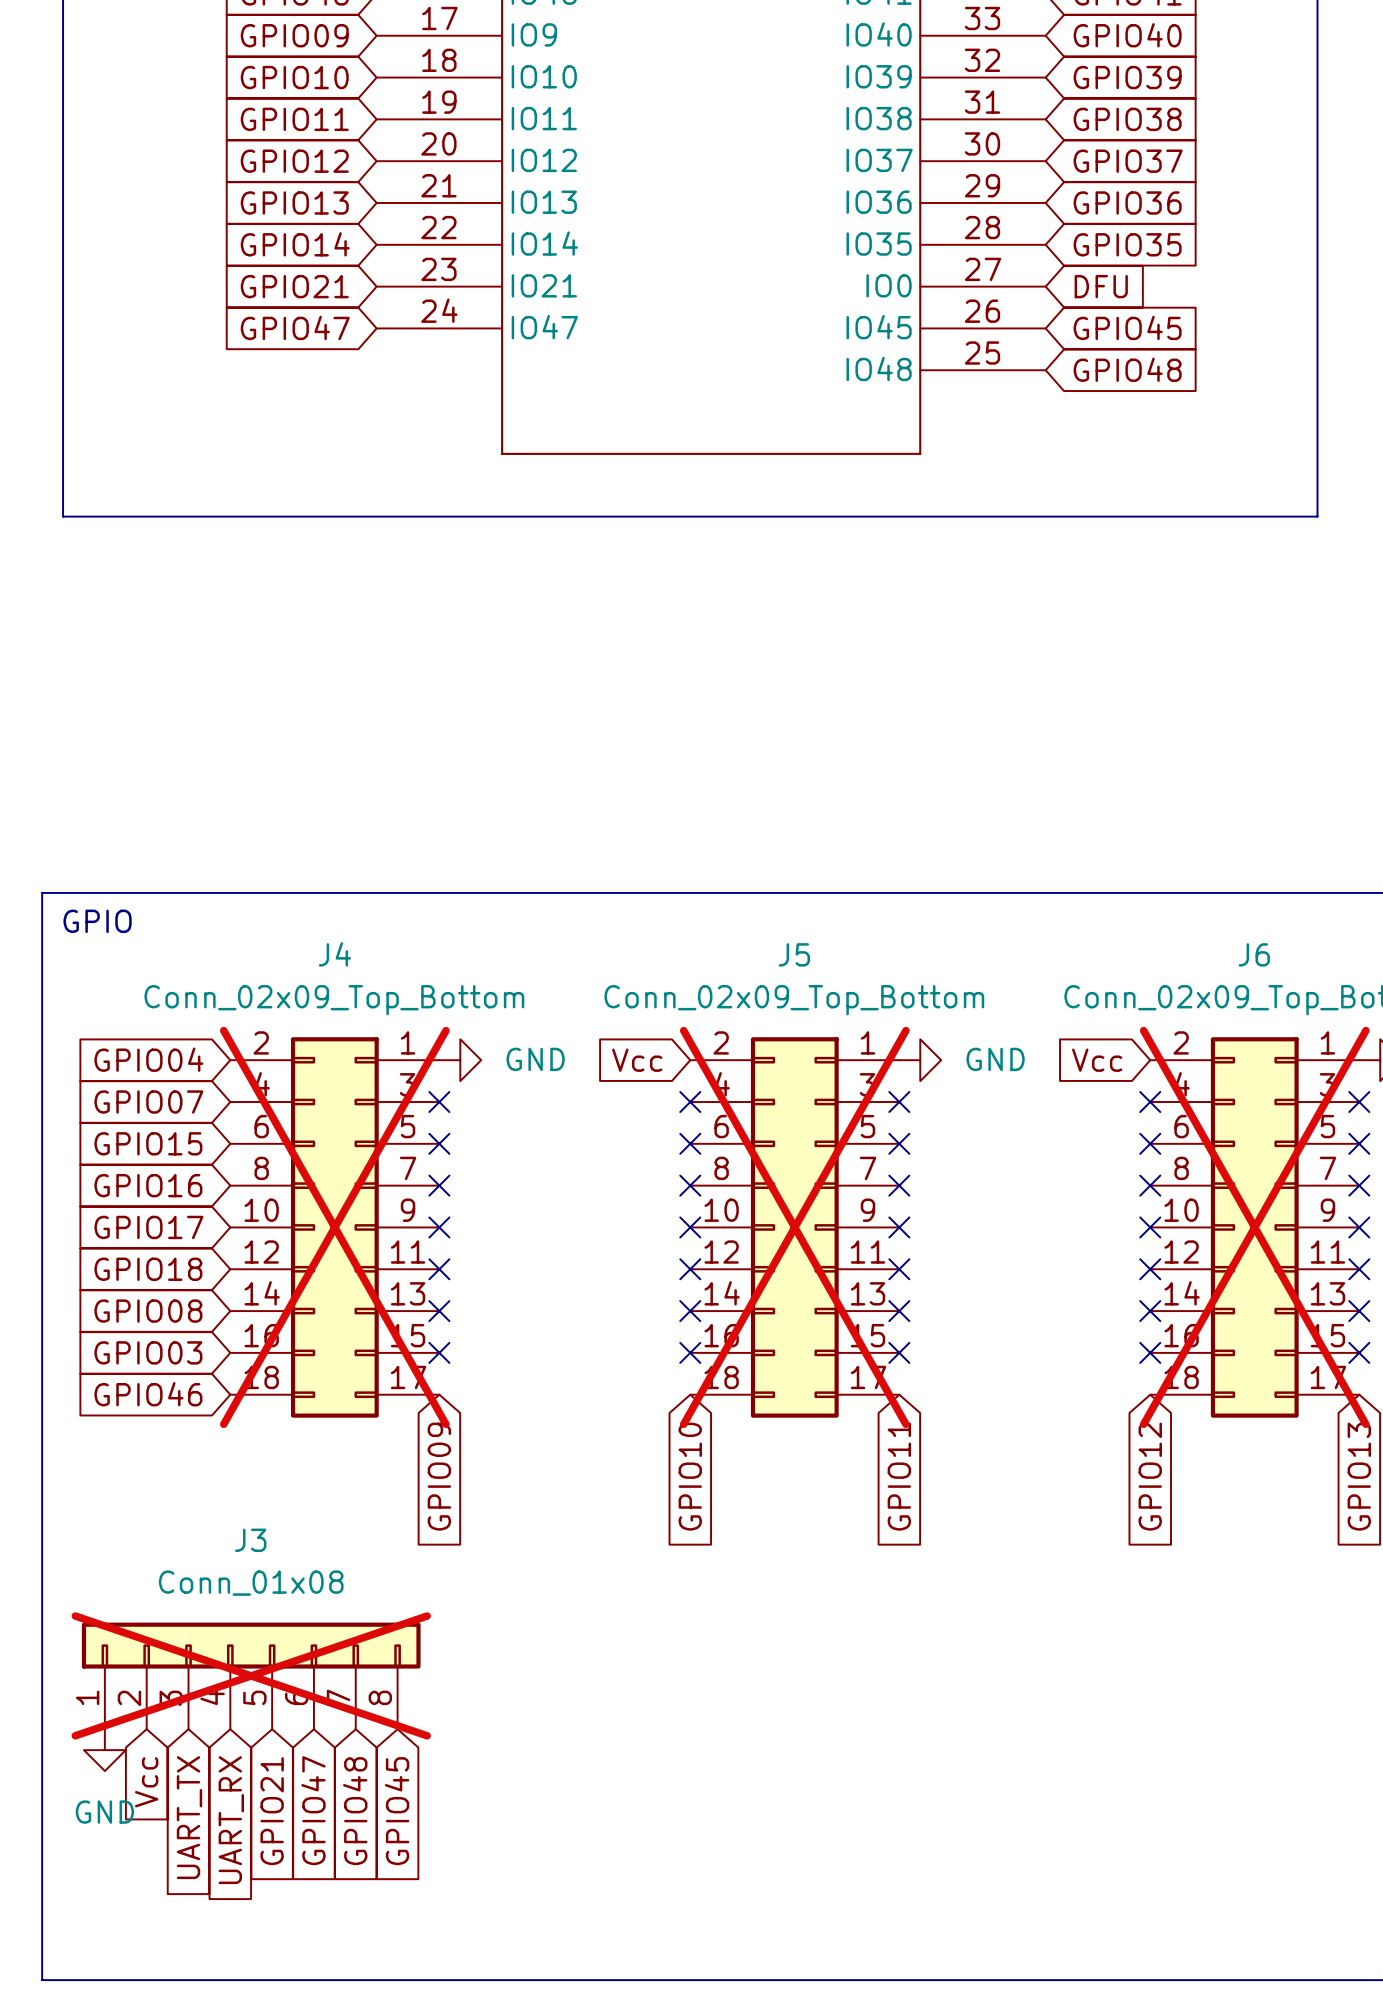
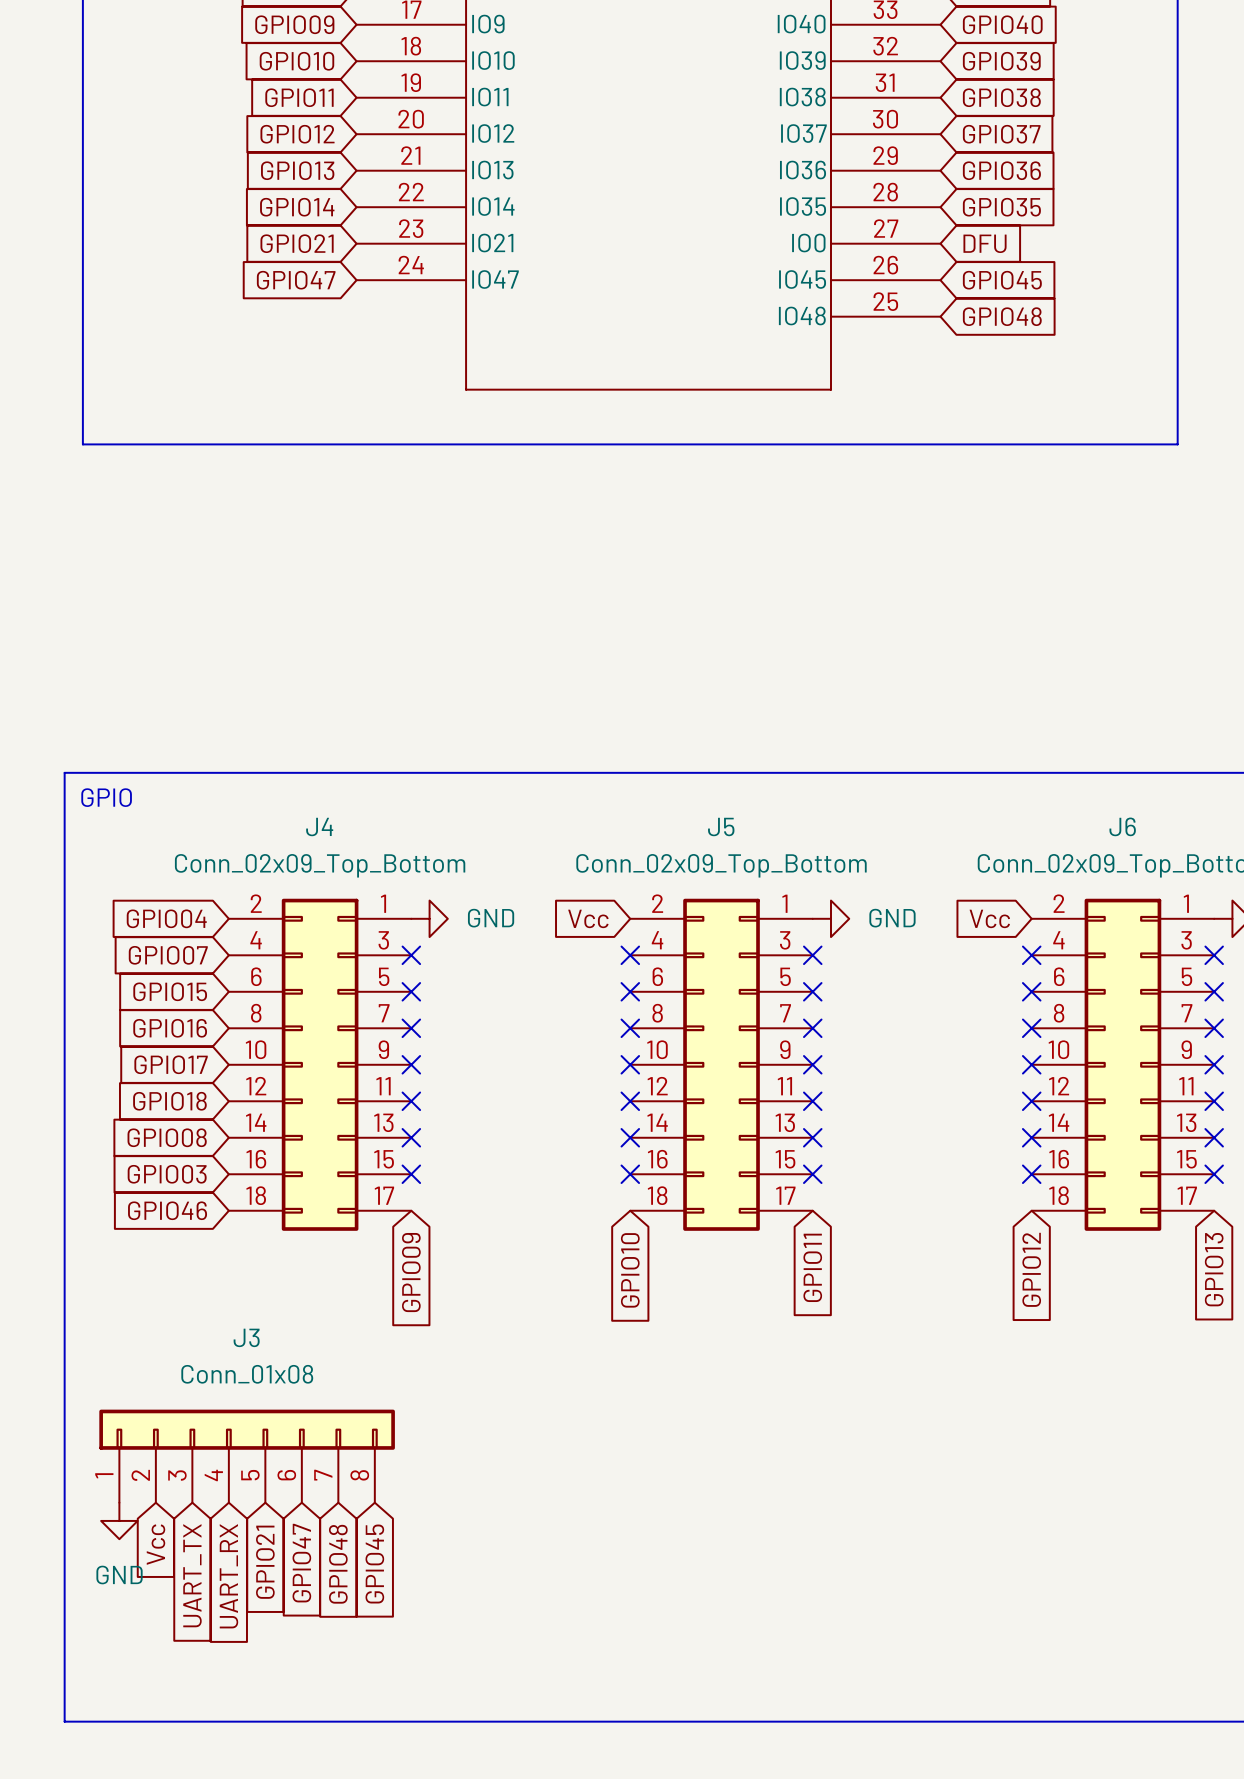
J4 do-not-place cross: (334, 1227) -> none
J5 do-not-place cross: (794, 1227) -> none
J6 do-not-place cross: (1254, 1227) -> none
J3 do-not-place cross: (251, 1675) -> none

